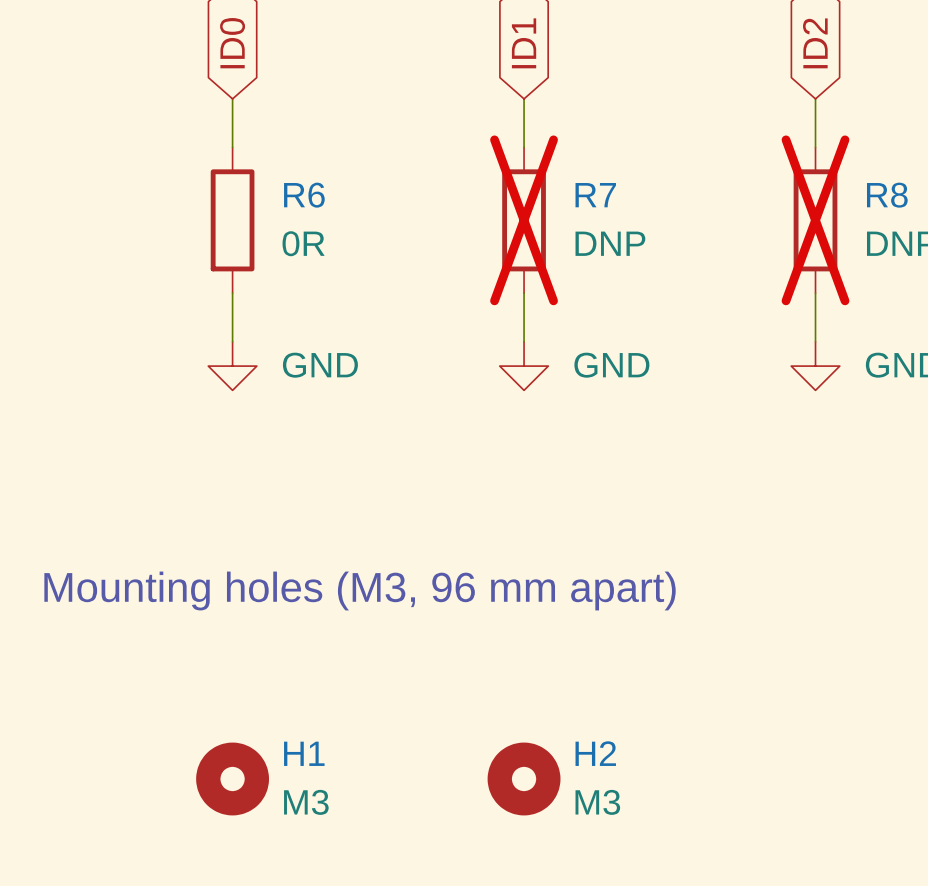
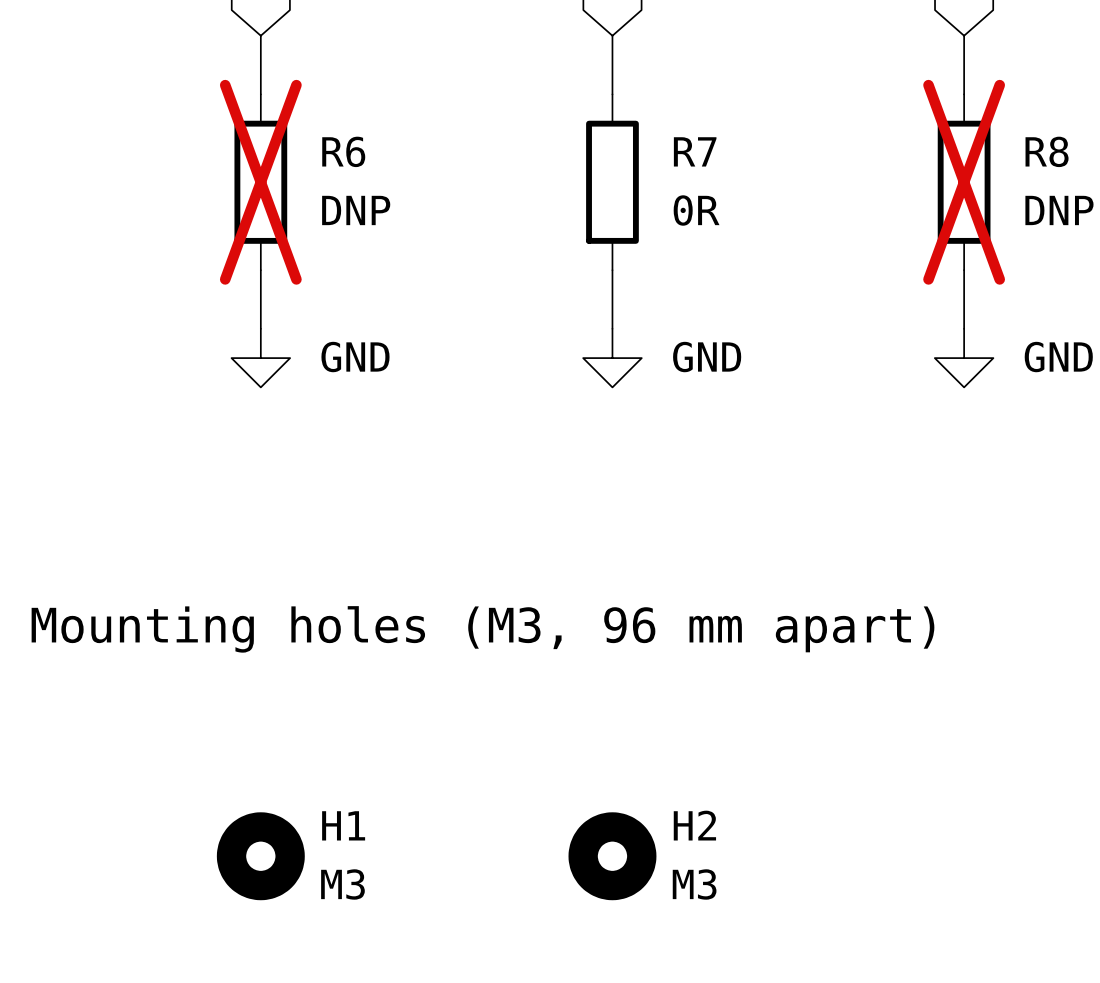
R6 do-not-place cross: none -> (260, 182)
R7 do-not-place cross: (524, 220) -> none
R6 value: 0R (303, 243) -> DNP (356, 210)
R7 value: DNP (610, 243) -> 0R (696, 210)

